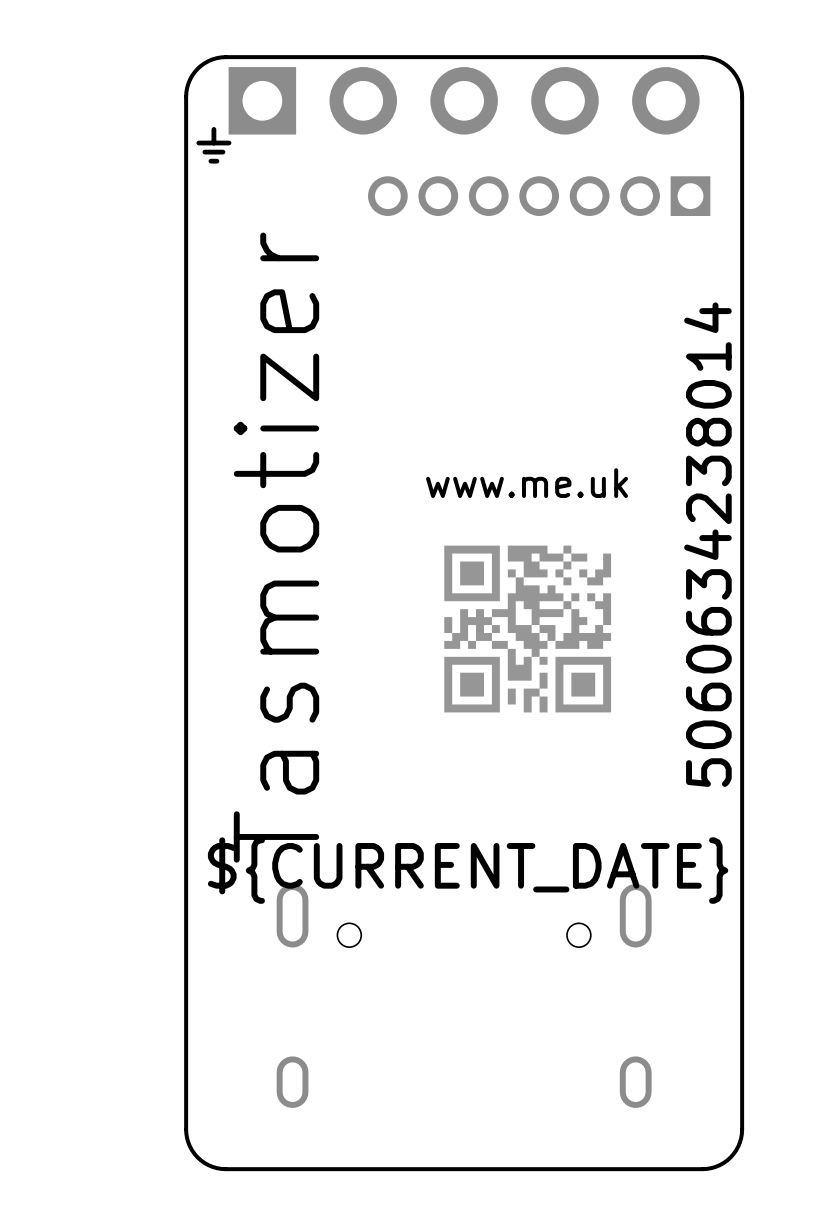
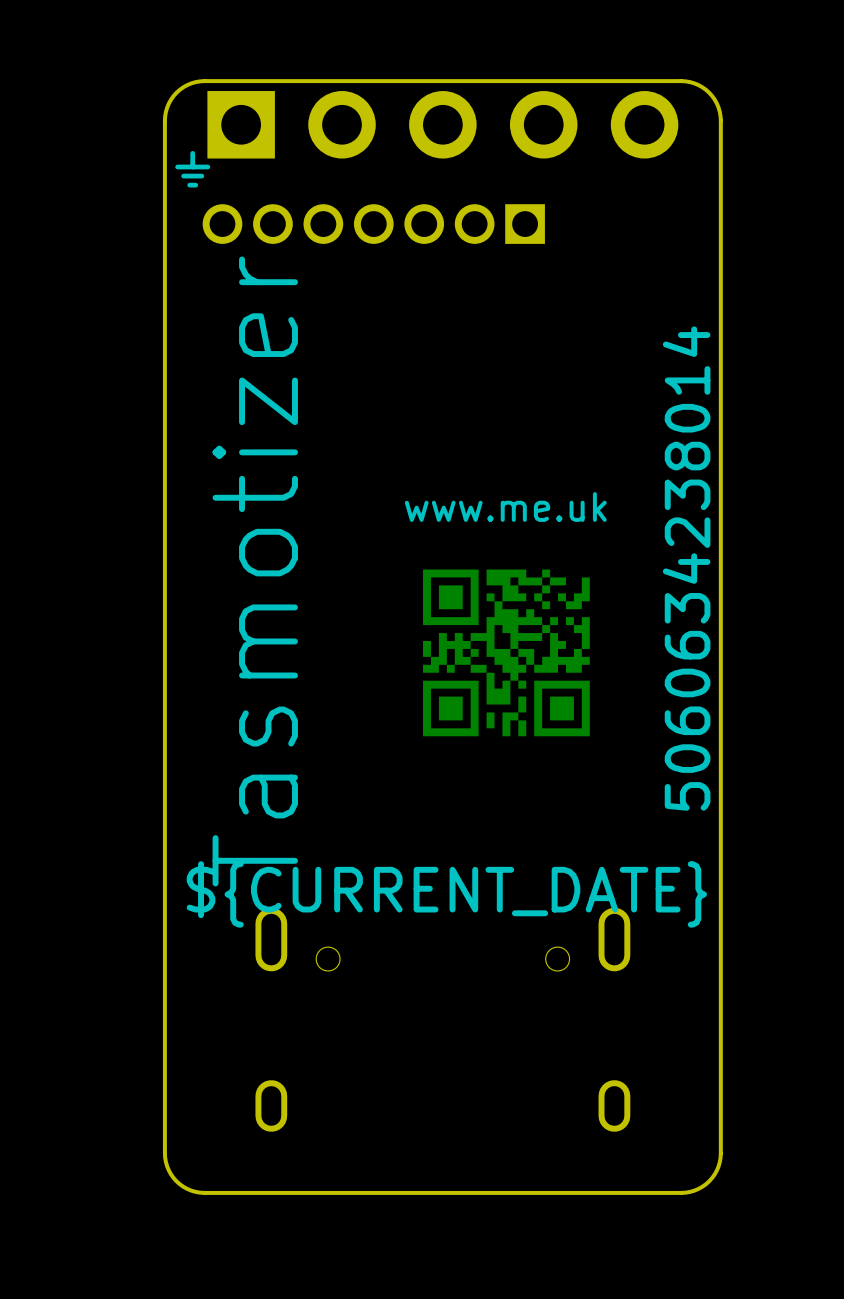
part position: (539, 196) -> (373, 224)

